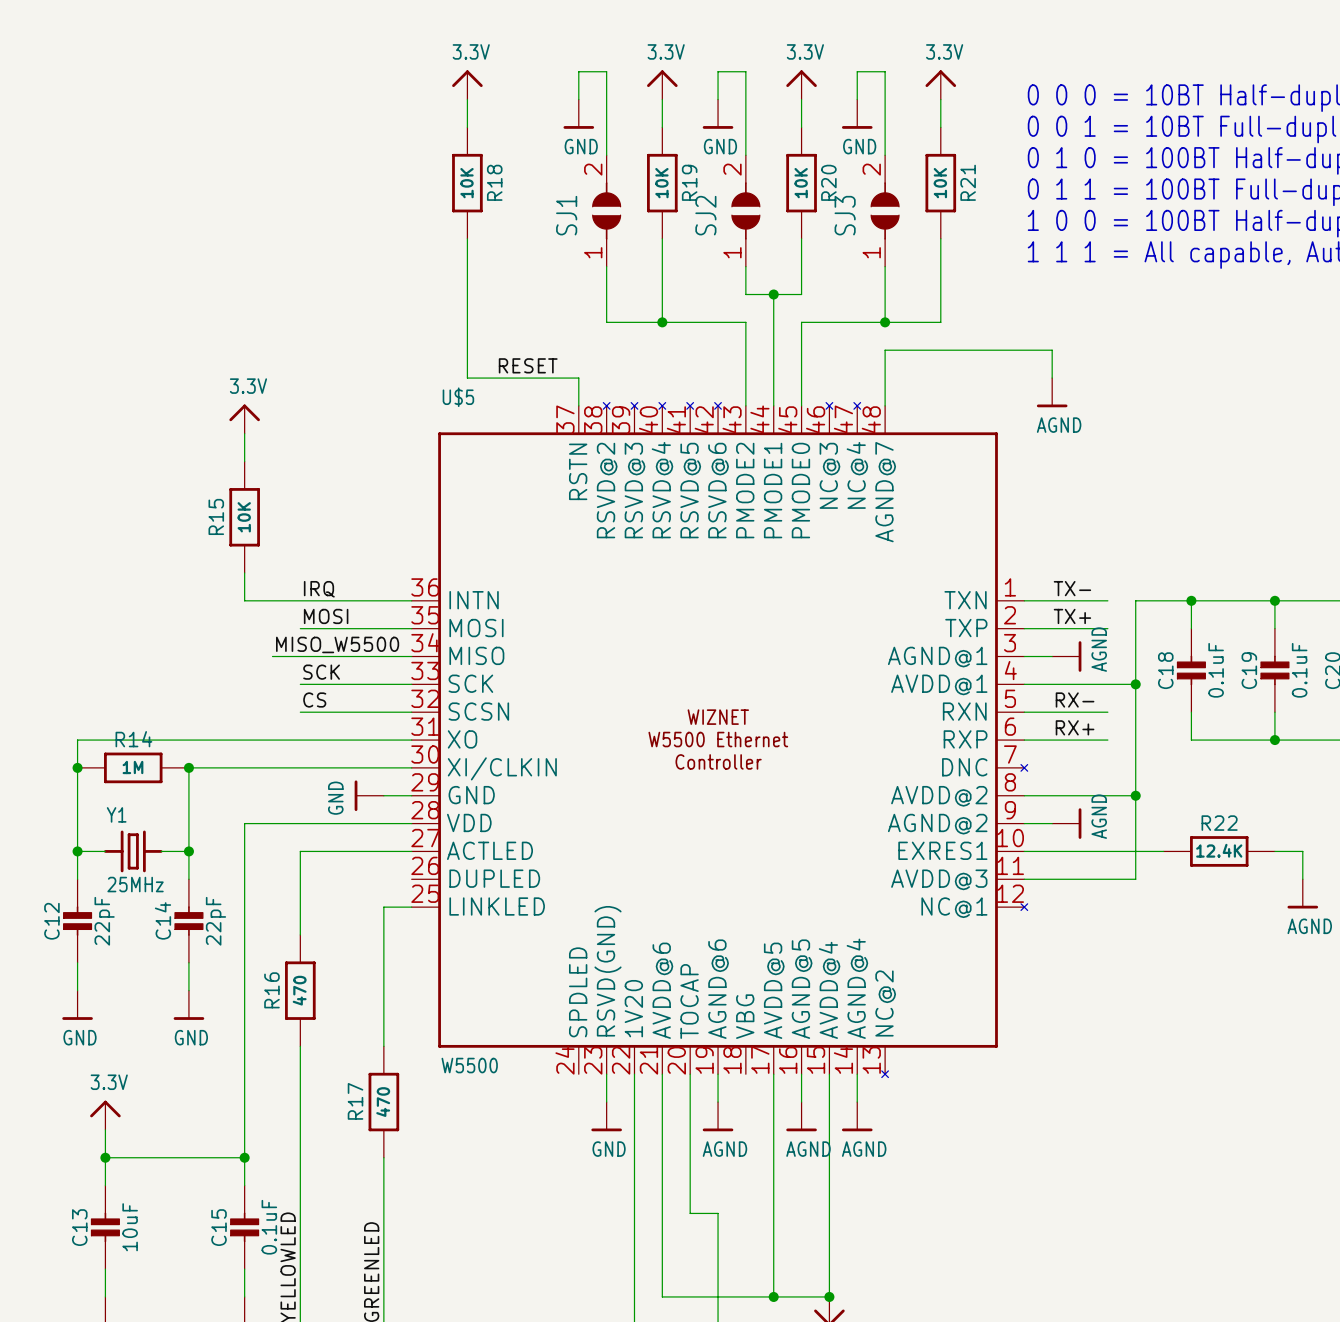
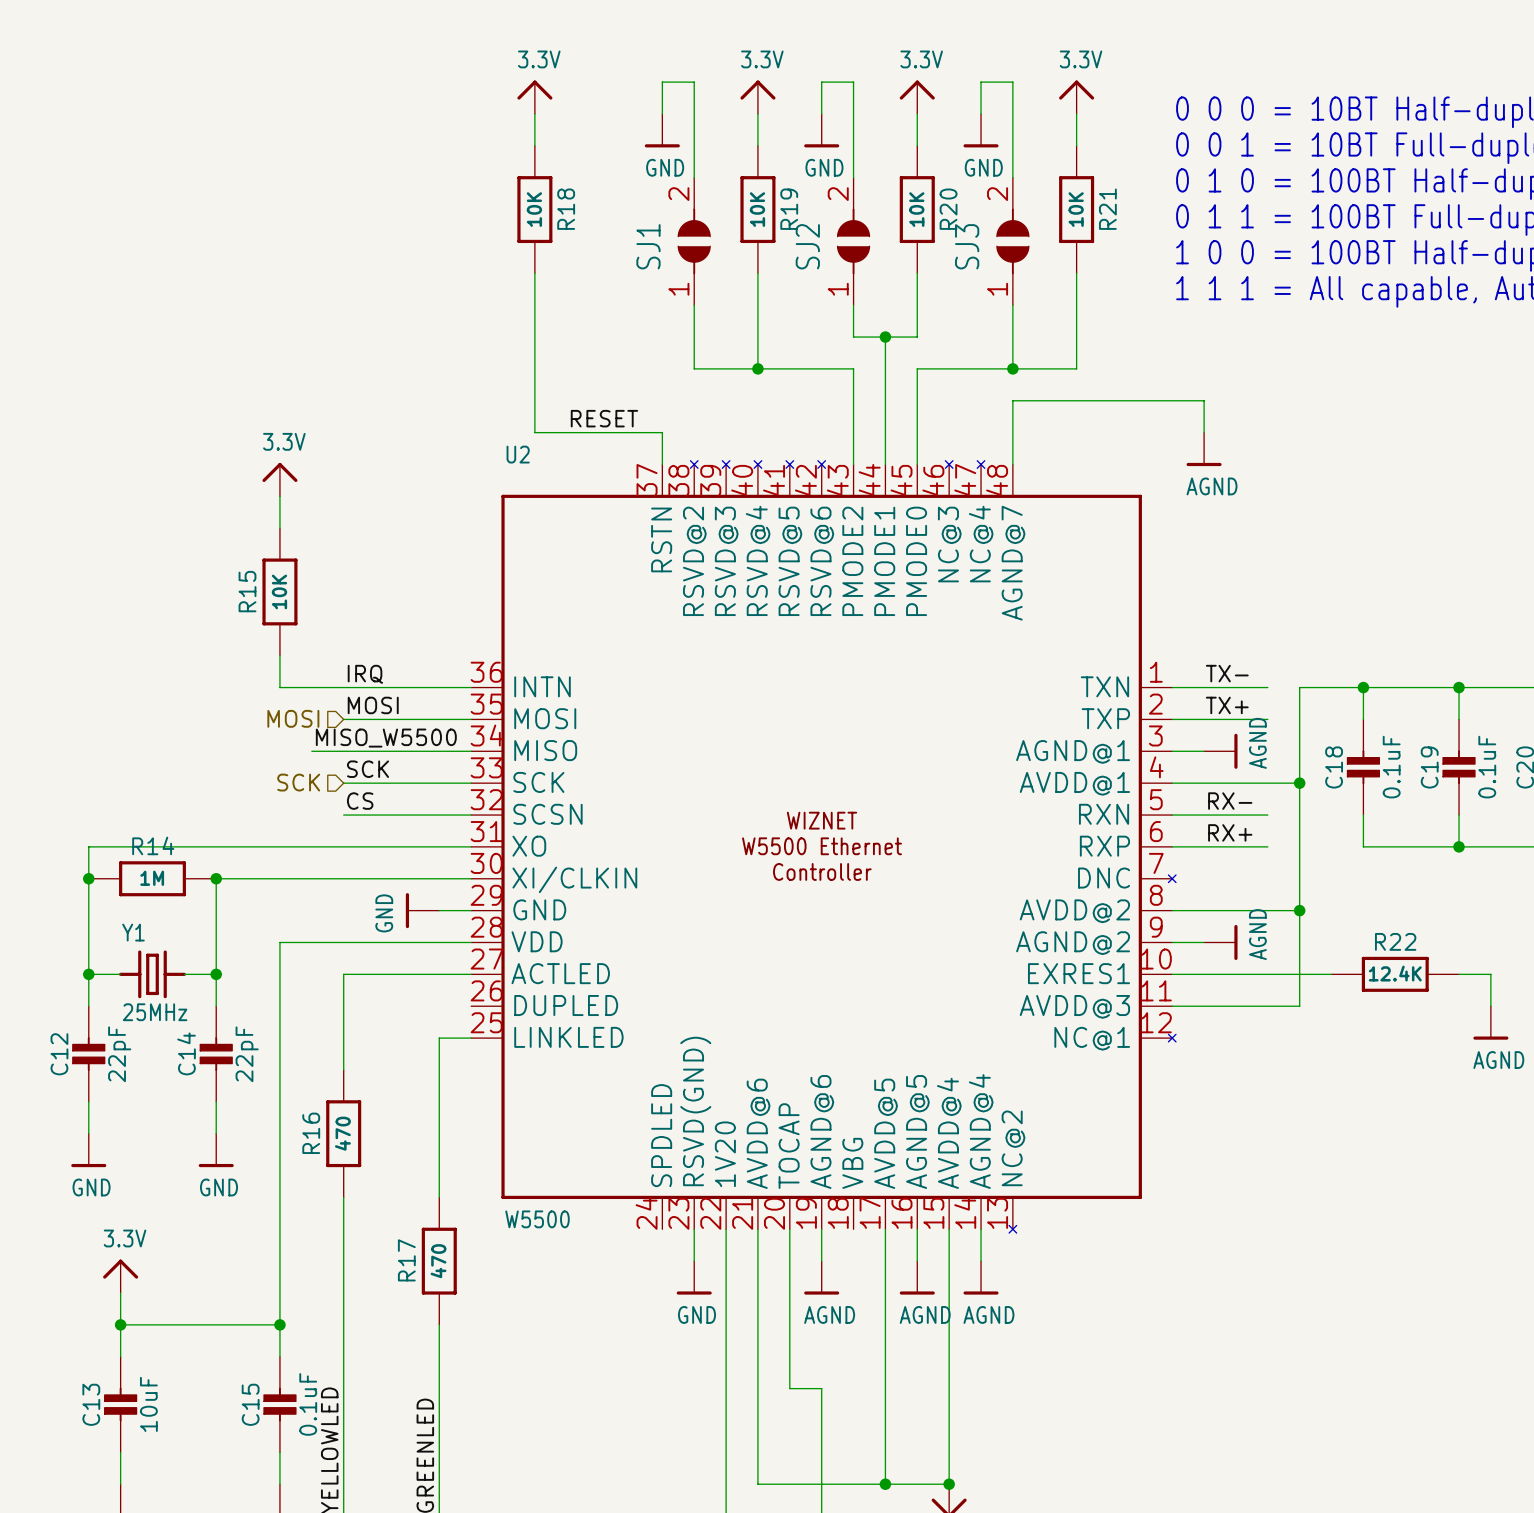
U$5 name: U$5 (458, 397) -> U2 (518, 454)
hierarchical label: none -> MOSI (293, 718)
hierarchical label: none -> SCK (298, 782)

